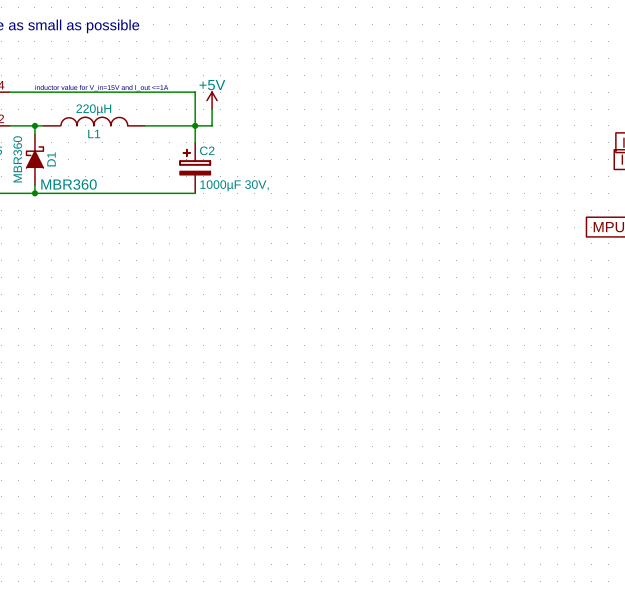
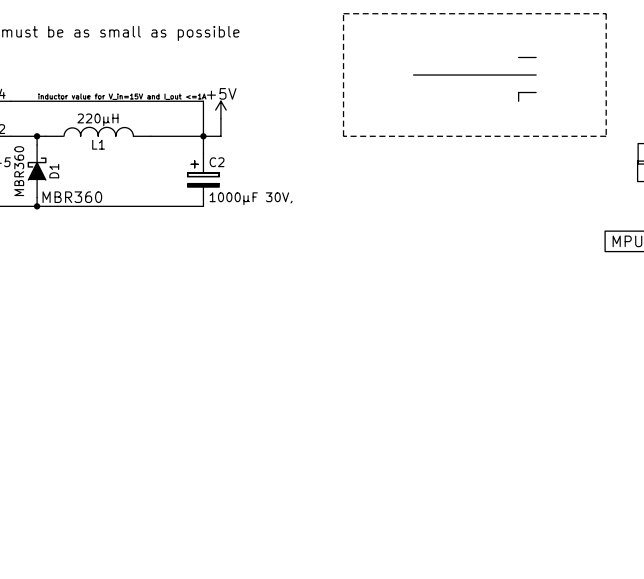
line: none -> (343, 13) (606, 13) (606, 136) (343, 136) (343, 13)
wire: none -> (518, 57) (536, 57)
wire: none -> (413, 75) (536, 75)
wire: none -> (536, 92) (518, 92) (518, 101)

